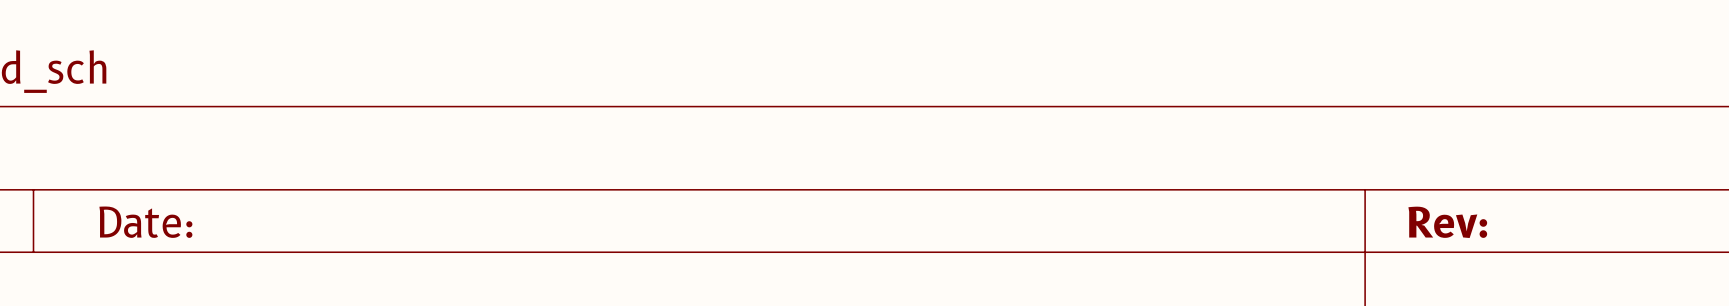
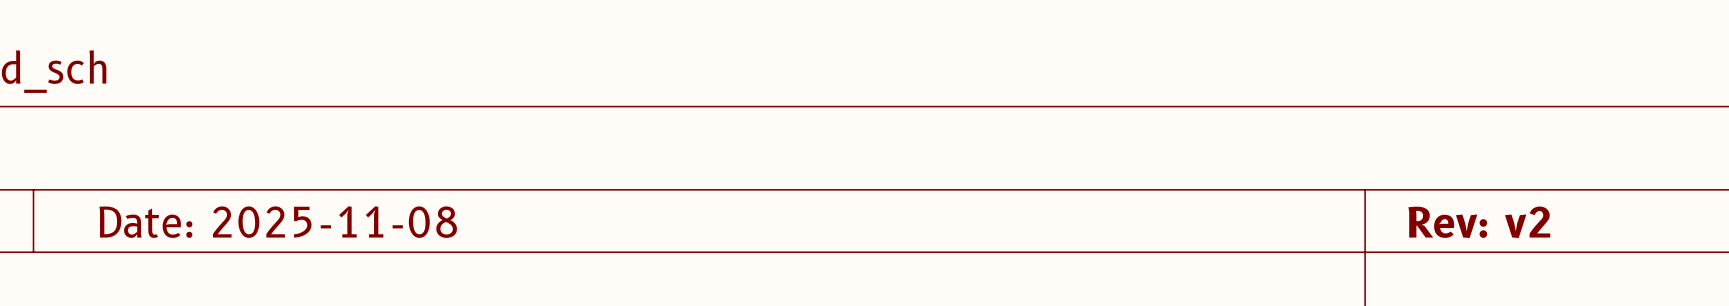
title block: Date: (145, 222) -> Date: 2025-11-08 (278, 222)
title block: Rev: (1447, 222) -> Rev: v2 (1479, 222)

